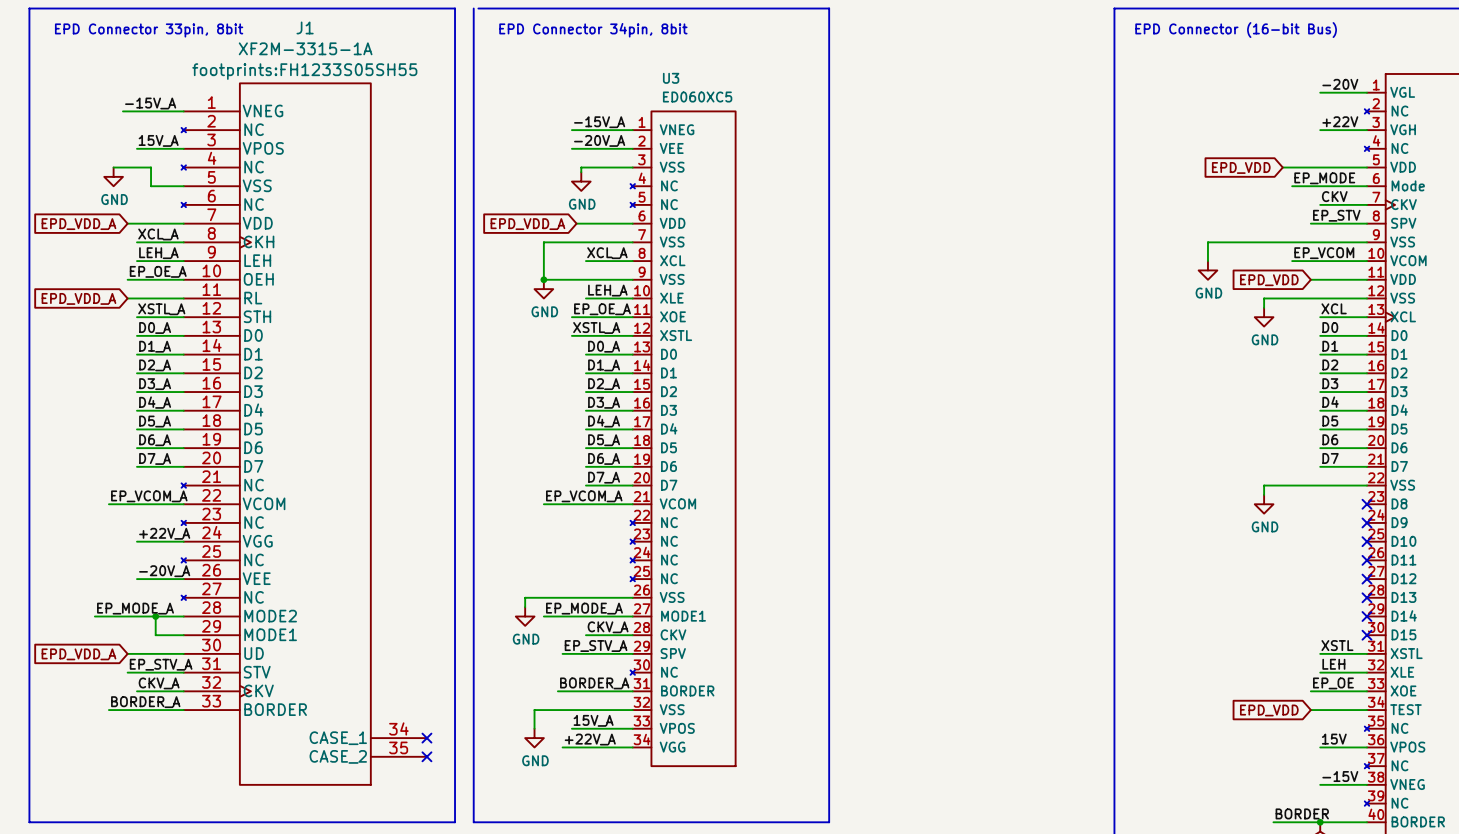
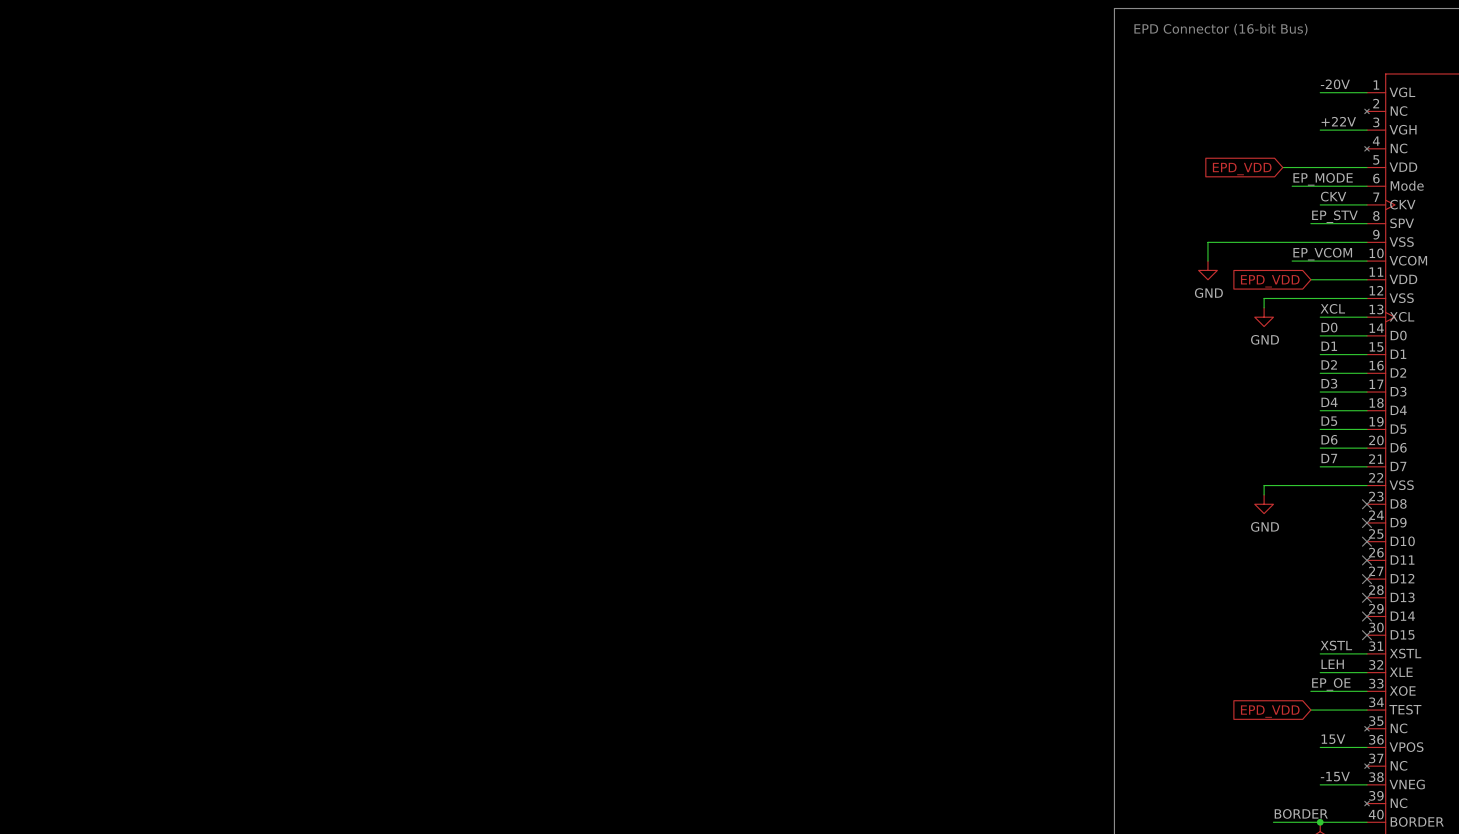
line: (29, 8) (29, 822) (455, 822) (455, 8) (29, 8) -> none
line: (473, 8) (473, 822) (829, 822) (829, 8) (478, 8) -> none
text: EPD Connector 33pin, 8bit (149, 30) -> none
text: EPD Connector 34pin, 8bit (593, 30) -> none
label: -15V_A (150, 103) -> none
wire: (122, 111) (183, 111) -> none
label: -15V_A (599, 122) -> none
wire: (571, 130) (632, 130) -> none
label: 15V_A (158, 140) -> none
label: -20V_A (599, 140) -> none
wire: (136, 148) (183, 148) -> none
wire: (571, 148) (632, 148) -> none
wire: (113, 167) (151, 167) (151, 186) (183, 186) -> none
wire: (632, 167) (581, 167) (581, 172) -> none
power symbol: GND (113, 176) -> none
power symbol: GND (581, 181) -> none
wire: (127, 223) (183, 223) -> none
wire: (576, 223) (632, 223) -> none
global label: EPD_VDD_A (78, 224) -> none
global label: EPD_VDD_A (527, 224) -> none
label: XCL_A (158, 234) -> none
wire: (136, 242) (183, 242) -> none
wire: (632, 242) (543, 242) (543, 279) (632, 279) -> none
label: LEH_A (158, 253) -> none
label: XCL_A (607, 253) -> none
wire: (136, 261) (183, 261) -> none
wire: (585, 261) (632, 261) -> none
label: EP_OE_A (158, 271) -> none
wire: (127, 279) (183, 279) -> none
junction: (543, 279) -> none
power symbol: GND (543, 289) -> none
label: LEH_A (607, 290) -> none
global label: EPD_VDD_A (78, 298) -> none
wire: (127, 298) (183, 298) -> none
wire: (585, 298) (632, 298) -> none
label: XSTL_A (161, 309) -> none
label: EP_OE_A (602, 309) -> none
wire: (136, 317) (183, 317) -> none
wire: (571, 317) (632, 317) -> none
label: D0_A (155, 327) -> none
label: XSTL_A (596, 327) -> none
wire: (136, 335) (183, 335) -> none
wire: (571, 335) (632, 335) -> none
label: D1_A (155, 346) -> none
label: D0_A (604, 346) -> none
wire: (136, 354) (183, 354) -> none
wire: (585, 354) (632, 354) -> none
label: D2_A (155, 365) -> none
label: D1_A (604, 365) -> none
wire: (136, 373) (183, 373) -> none
wire: (585, 373) (632, 373) -> none
label: D3_A (155, 384) -> none
label: D2_A (604, 384) -> none
wire: (136, 392) (183, 392) -> none
wire: (585, 392) (632, 392) -> none
label: D4_A (155, 402) -> none
label: D3_A (604, 402) -> none
wire: (136, 410) (183, 410) -> none
wire: (585, 410) (632, 410) -> none
label: D5_A (155, 421) -> none
label: D4_A (604, 421) -> none
wire: (136, 429) (183, 429) -> none
wire: (585, 429) (632, 429) -> none
J1: XF2M-3315-1A (304, 434) -> none
U3: ED060XC5 (683, 438) -> none
label: D6_A (155, 440) -> none
label: D5_A (604, 440) -> none
wire: (136, 448) (183, 448) -> none
wire: (585, 448) (632, 448) -> none
label: D7_A (155, 458) -> none
label: D6_A (604, 458) -> none
wire: (136, 466) (183, 466) -> none
wire: (585, 466) (632, 466) -> none
label: D7_A (604, 477) -> none
wire: (585, 485) (632, 485) -> none
label: EP_VCOM_A (149, 496) -> none
label: EP_VCOM_A (584, 496) -> none
wire: (108, 504) (183, 504) -> none
wire: (543, 504) (632, 504) -> none
label: +22V_A (164, 533) -> none
wire: (136, 541) (183, 541) -> none
label: -20V_A (164, 571) -> none
wire: (136, 579) (183, 579) -> none
wire: (632, 597) (525, 597) (525, 607) -> none
label: EP_MODE_A (135, 608) -> none
label: EP_MODE_A (584, 608) -> none
wire: (94, 616) (183, 616) -> none
wire: (155, 616) (155, 635) (183, 635) -> none
junction: (155, 616) -> none
power symbol: GND (525, 616) -> none
wire: (543, 616) (632, 616) -> none
label: CKV_A (608, 627) -> none
wire: (585, 635) (632, 635) -> none
label: EP_STV_A (596, 646) -> none
wire: (127, 653) (183, 653) -> none
wire: (562, 653) (632, 653) -> none
global label: EPD_VDD_A (78, 654) -> none
label: EP_STV_A (161, 664) -> none
wire: (127, 672) (183, 672) -> none
label: CKV_A (159, 683) -> none
label: BORDER_A (594, 683) -> none
wire: (136, 691) (183, 691) -> none
wire: (557, 691) (632, 691) -> none
label: BORDER_A (145, 702) -> none
wire: (108, 710) (183, 710) -> none
wire: (632, 710) (534, 710) (534, 728) -> none
label: 15V_A (593, 720) -> none
wire: (571, 728) (632, 728) -> none
no-connect mark: (426, 738) -> none
power symbol: GND (534, 738) -> none
label: +22V_A (590, 739) -> none
wire: (562, 747) (632, 747) -> none
no-connect mark: (426, 756) -> none

